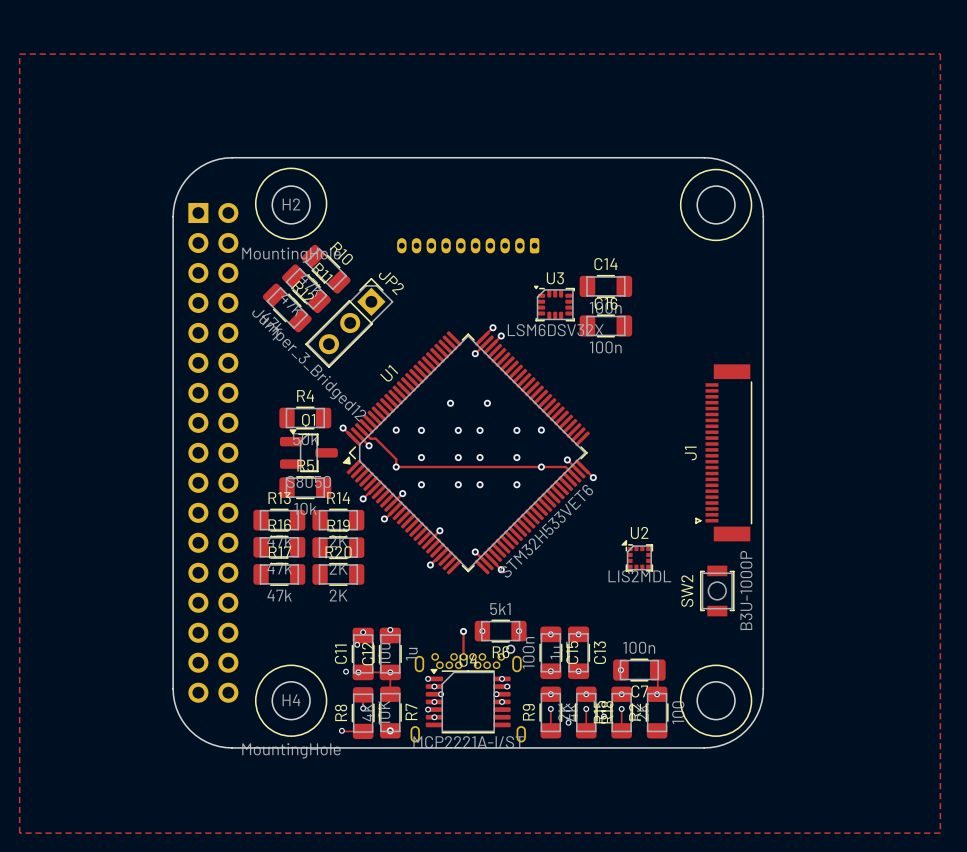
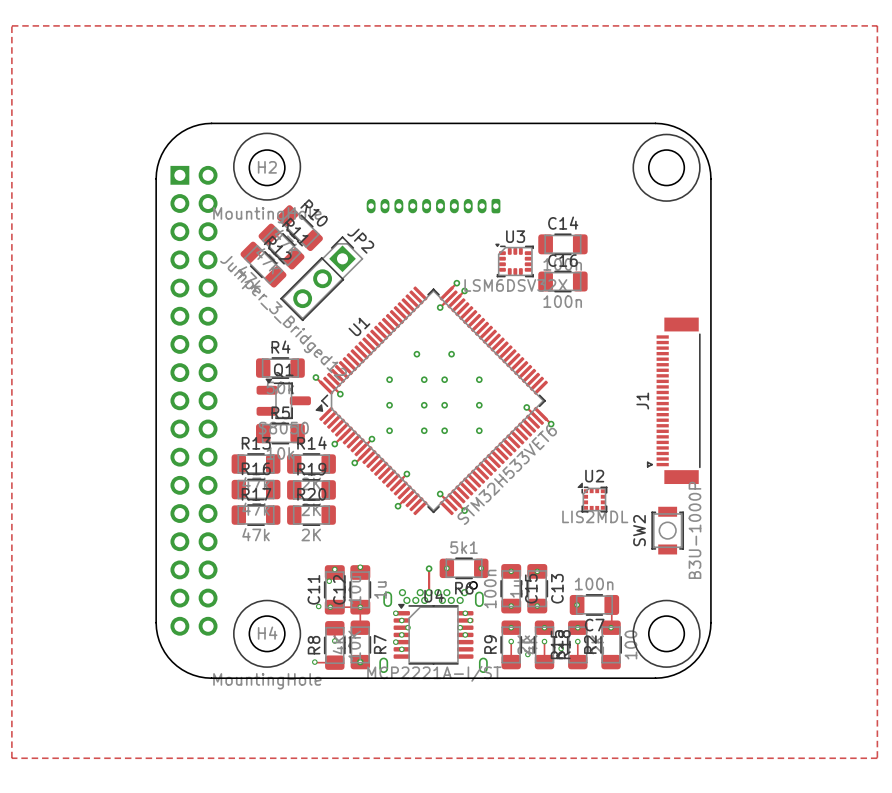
track: (362, 430) (370, 438) (375, 438) (396, 459) (396, 467) (565, 467) (574, 475) -> none
via: (396, 430) -> none
via: (541, 430) -> none
via: (396, 467) -> none
via: (541, 467) -> none

